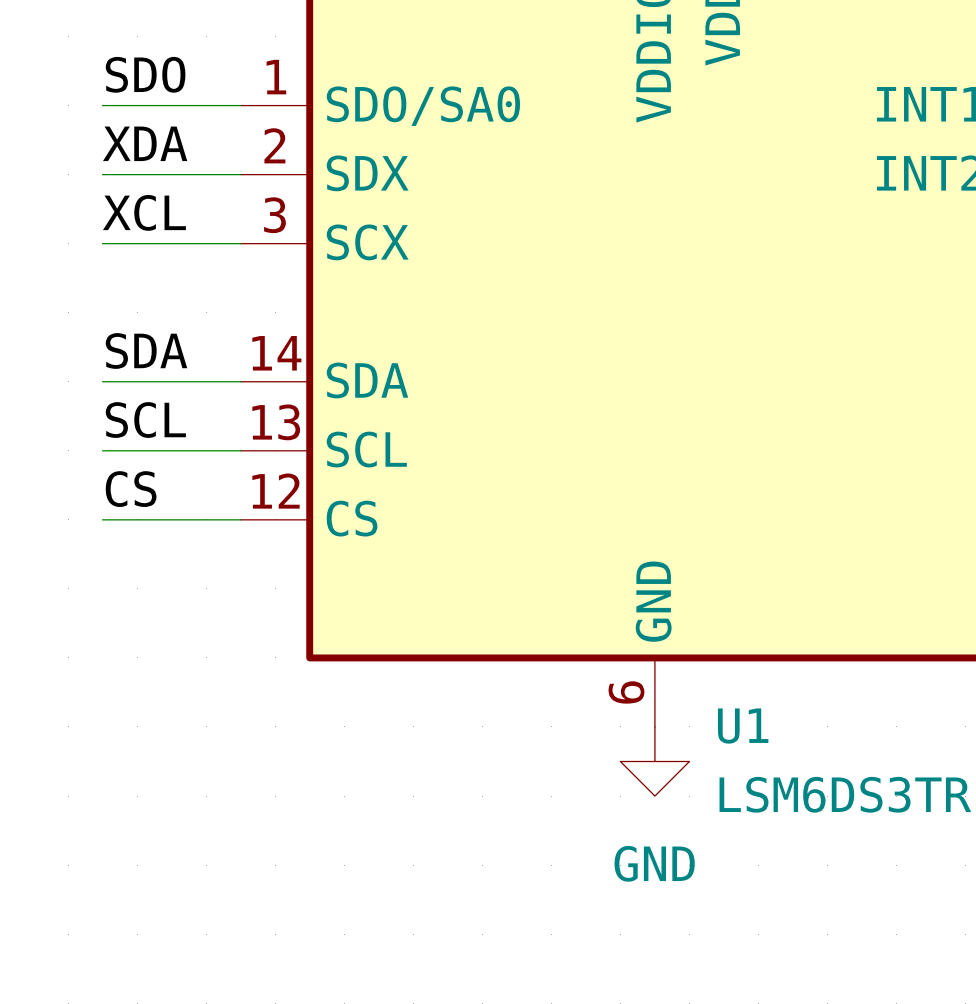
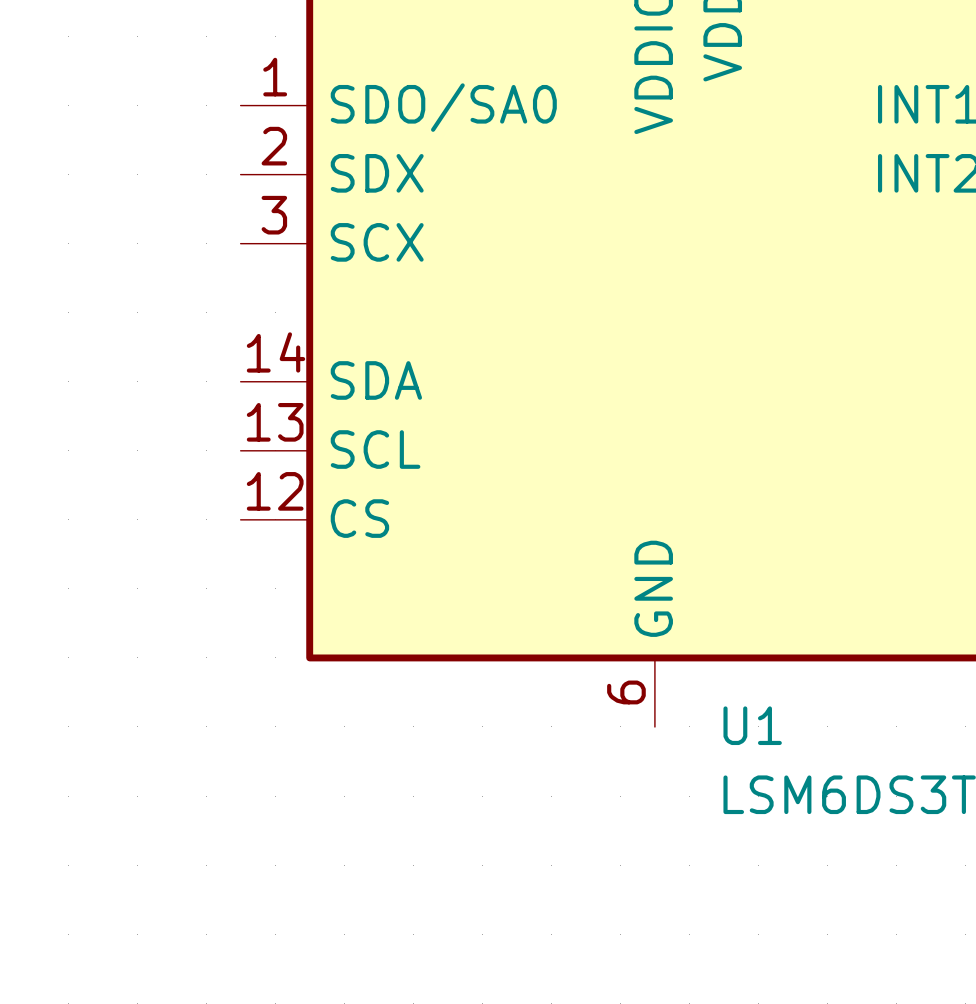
label: SDO (145, 74) -> none
wire: (102, 105) (240, 105) -> none
label: XDA (145, 143) -> none
wire: (102, 174) (240, 174) -> none
label: XCL (144, 212) -> none
wire: (102, 243) (240, 243) -> none
label: SDA (146, 350) -> none
wire: (102, 381) (240, 381) -> none
label: SCL (145, 420) -> none
wire: (102, 450) (240, 450) -> none
label: CS (131, 489) -> none
wire: (102, 519) (240, 519) -> none
power symbol: GND (654, 761) -> none

